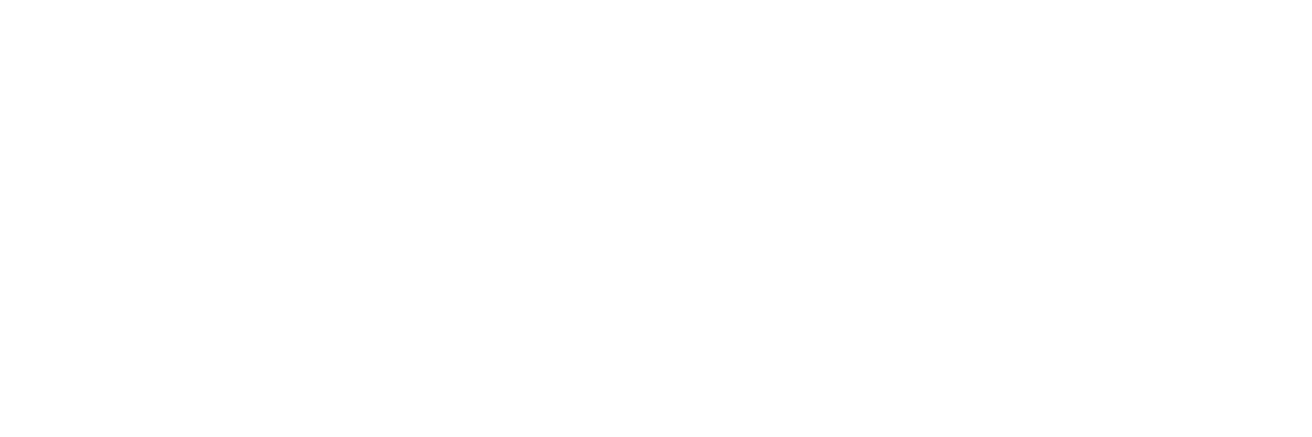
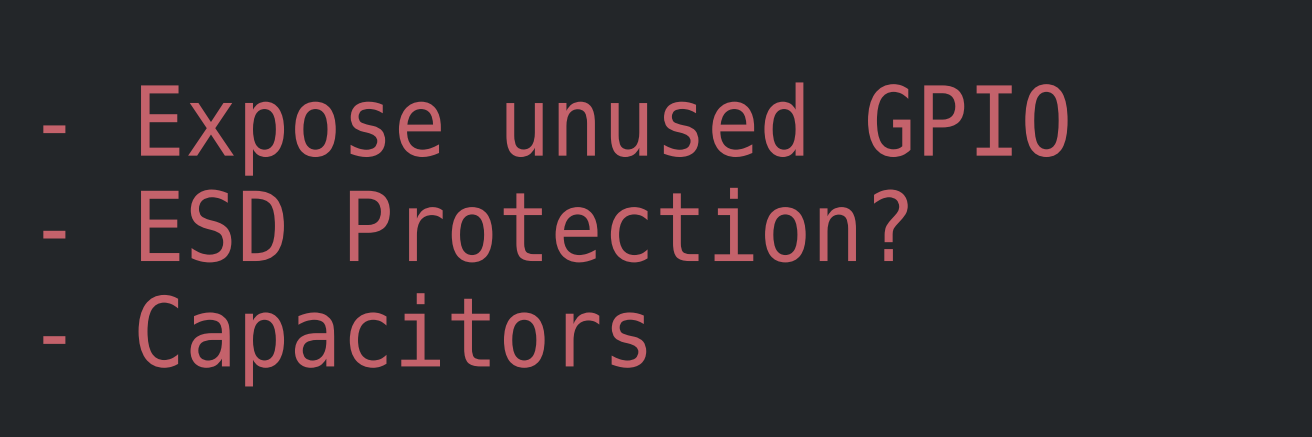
text: none -> - Expose unused GPIO (555, 129)
text: none -> - ESD Protection? (475, 225)
text: none -> - Capacitors (344, 339)

